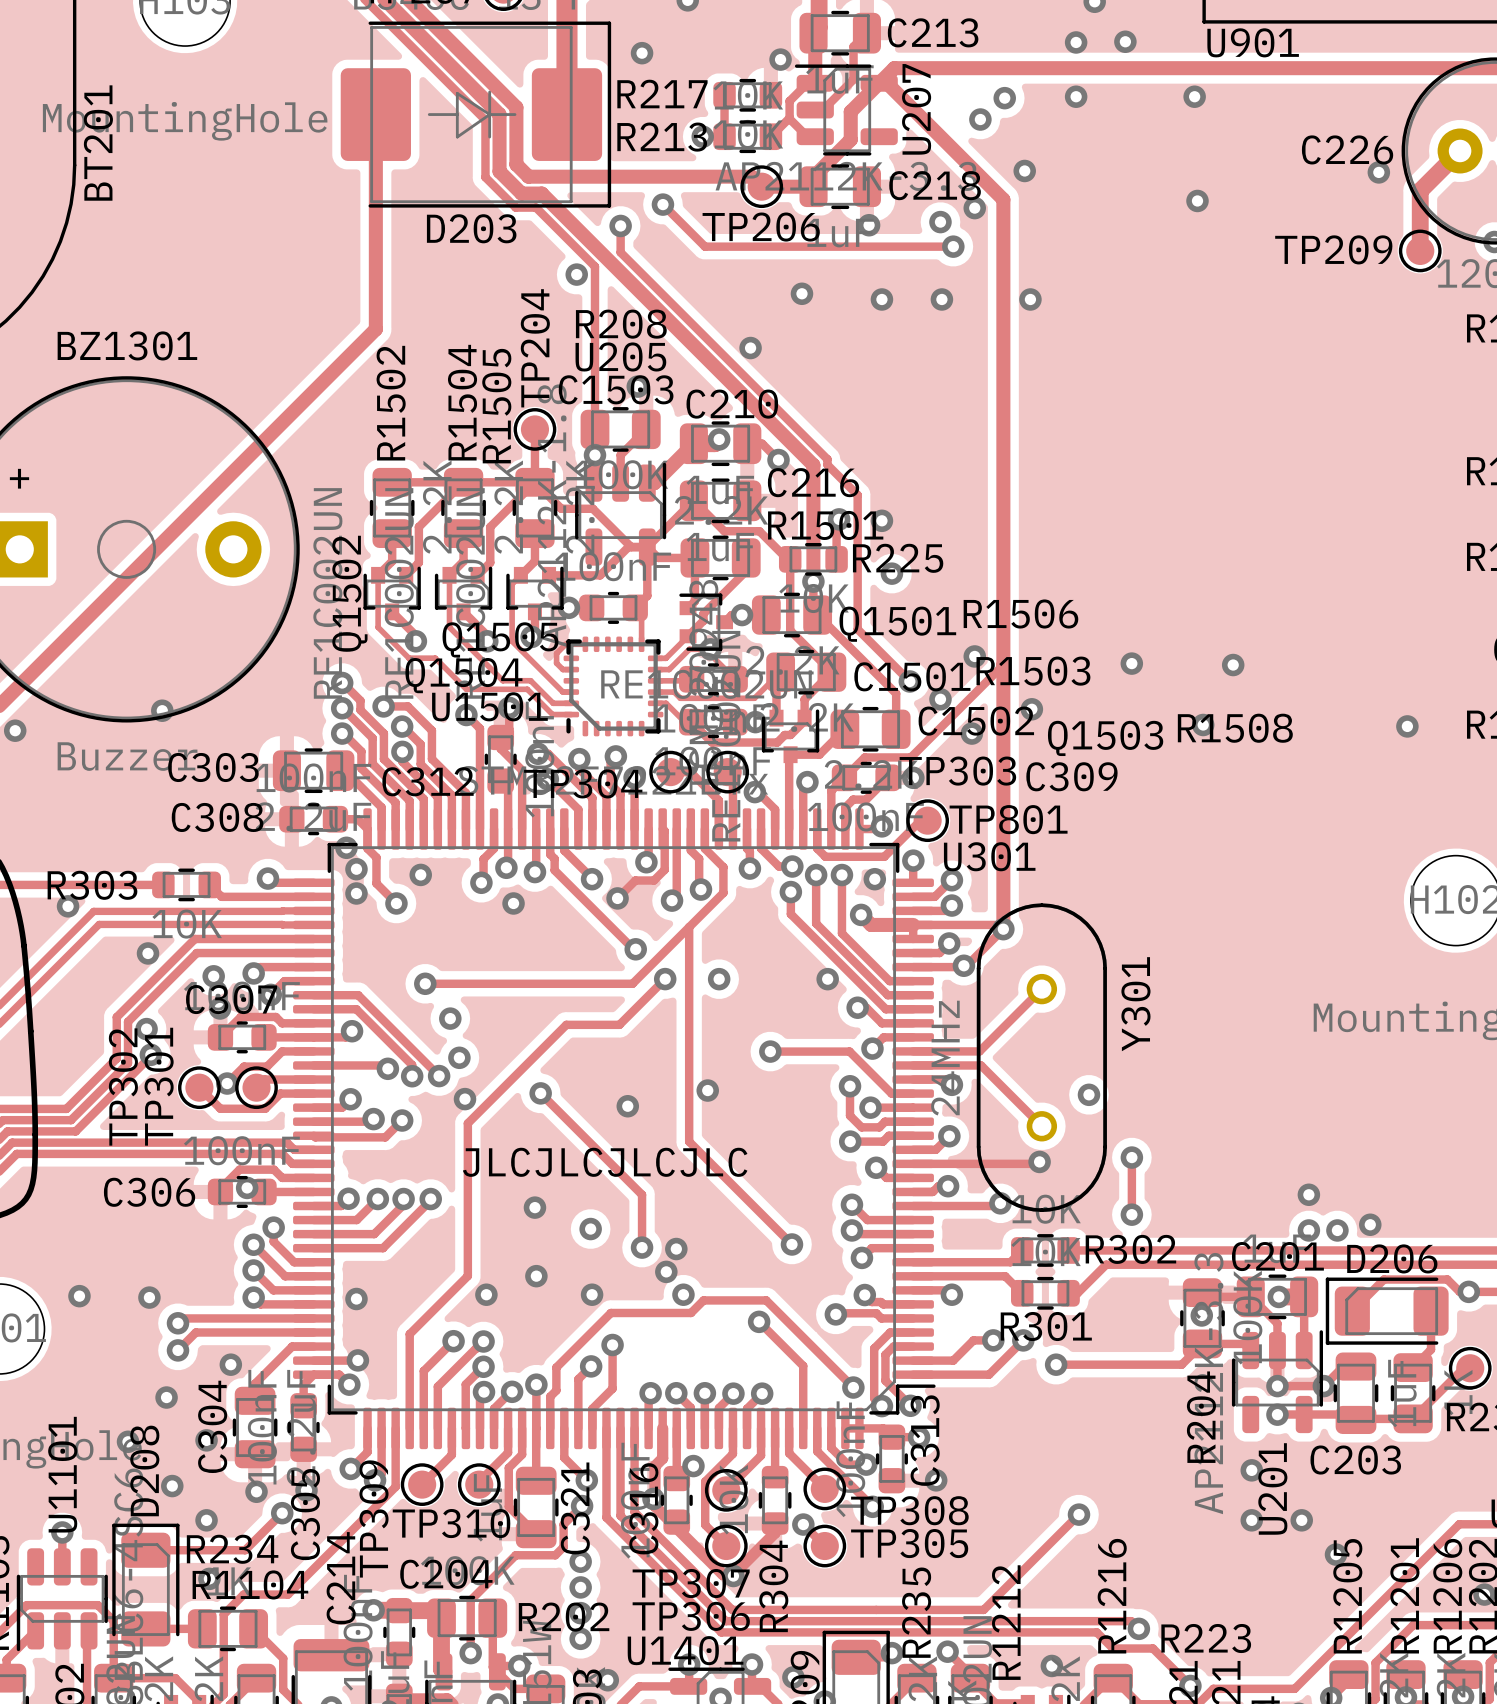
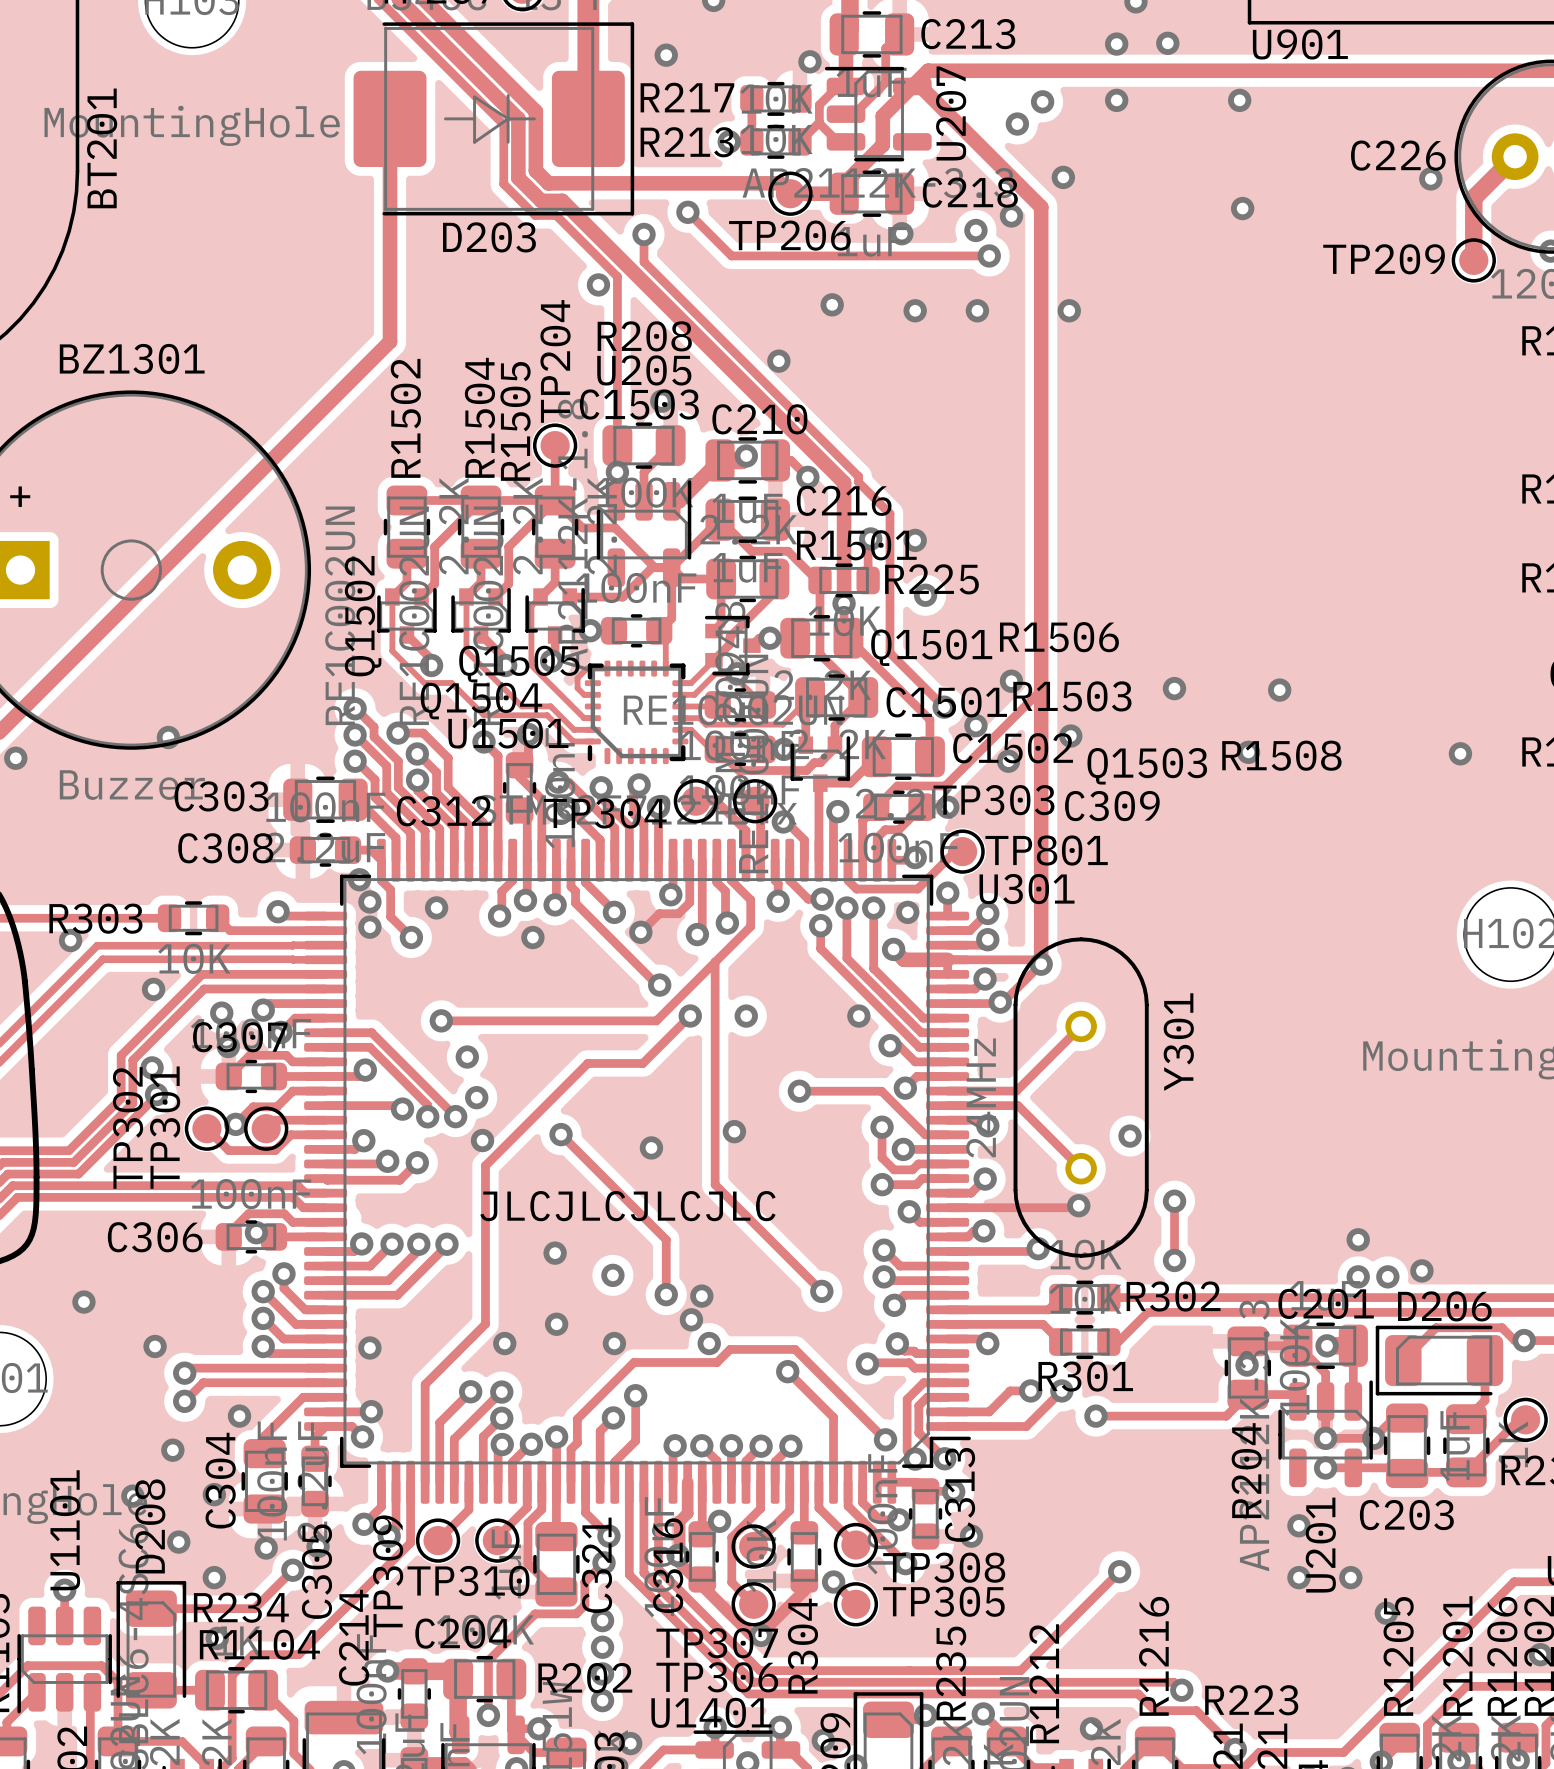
via position: (79, 1296) -> (83, 1302)

